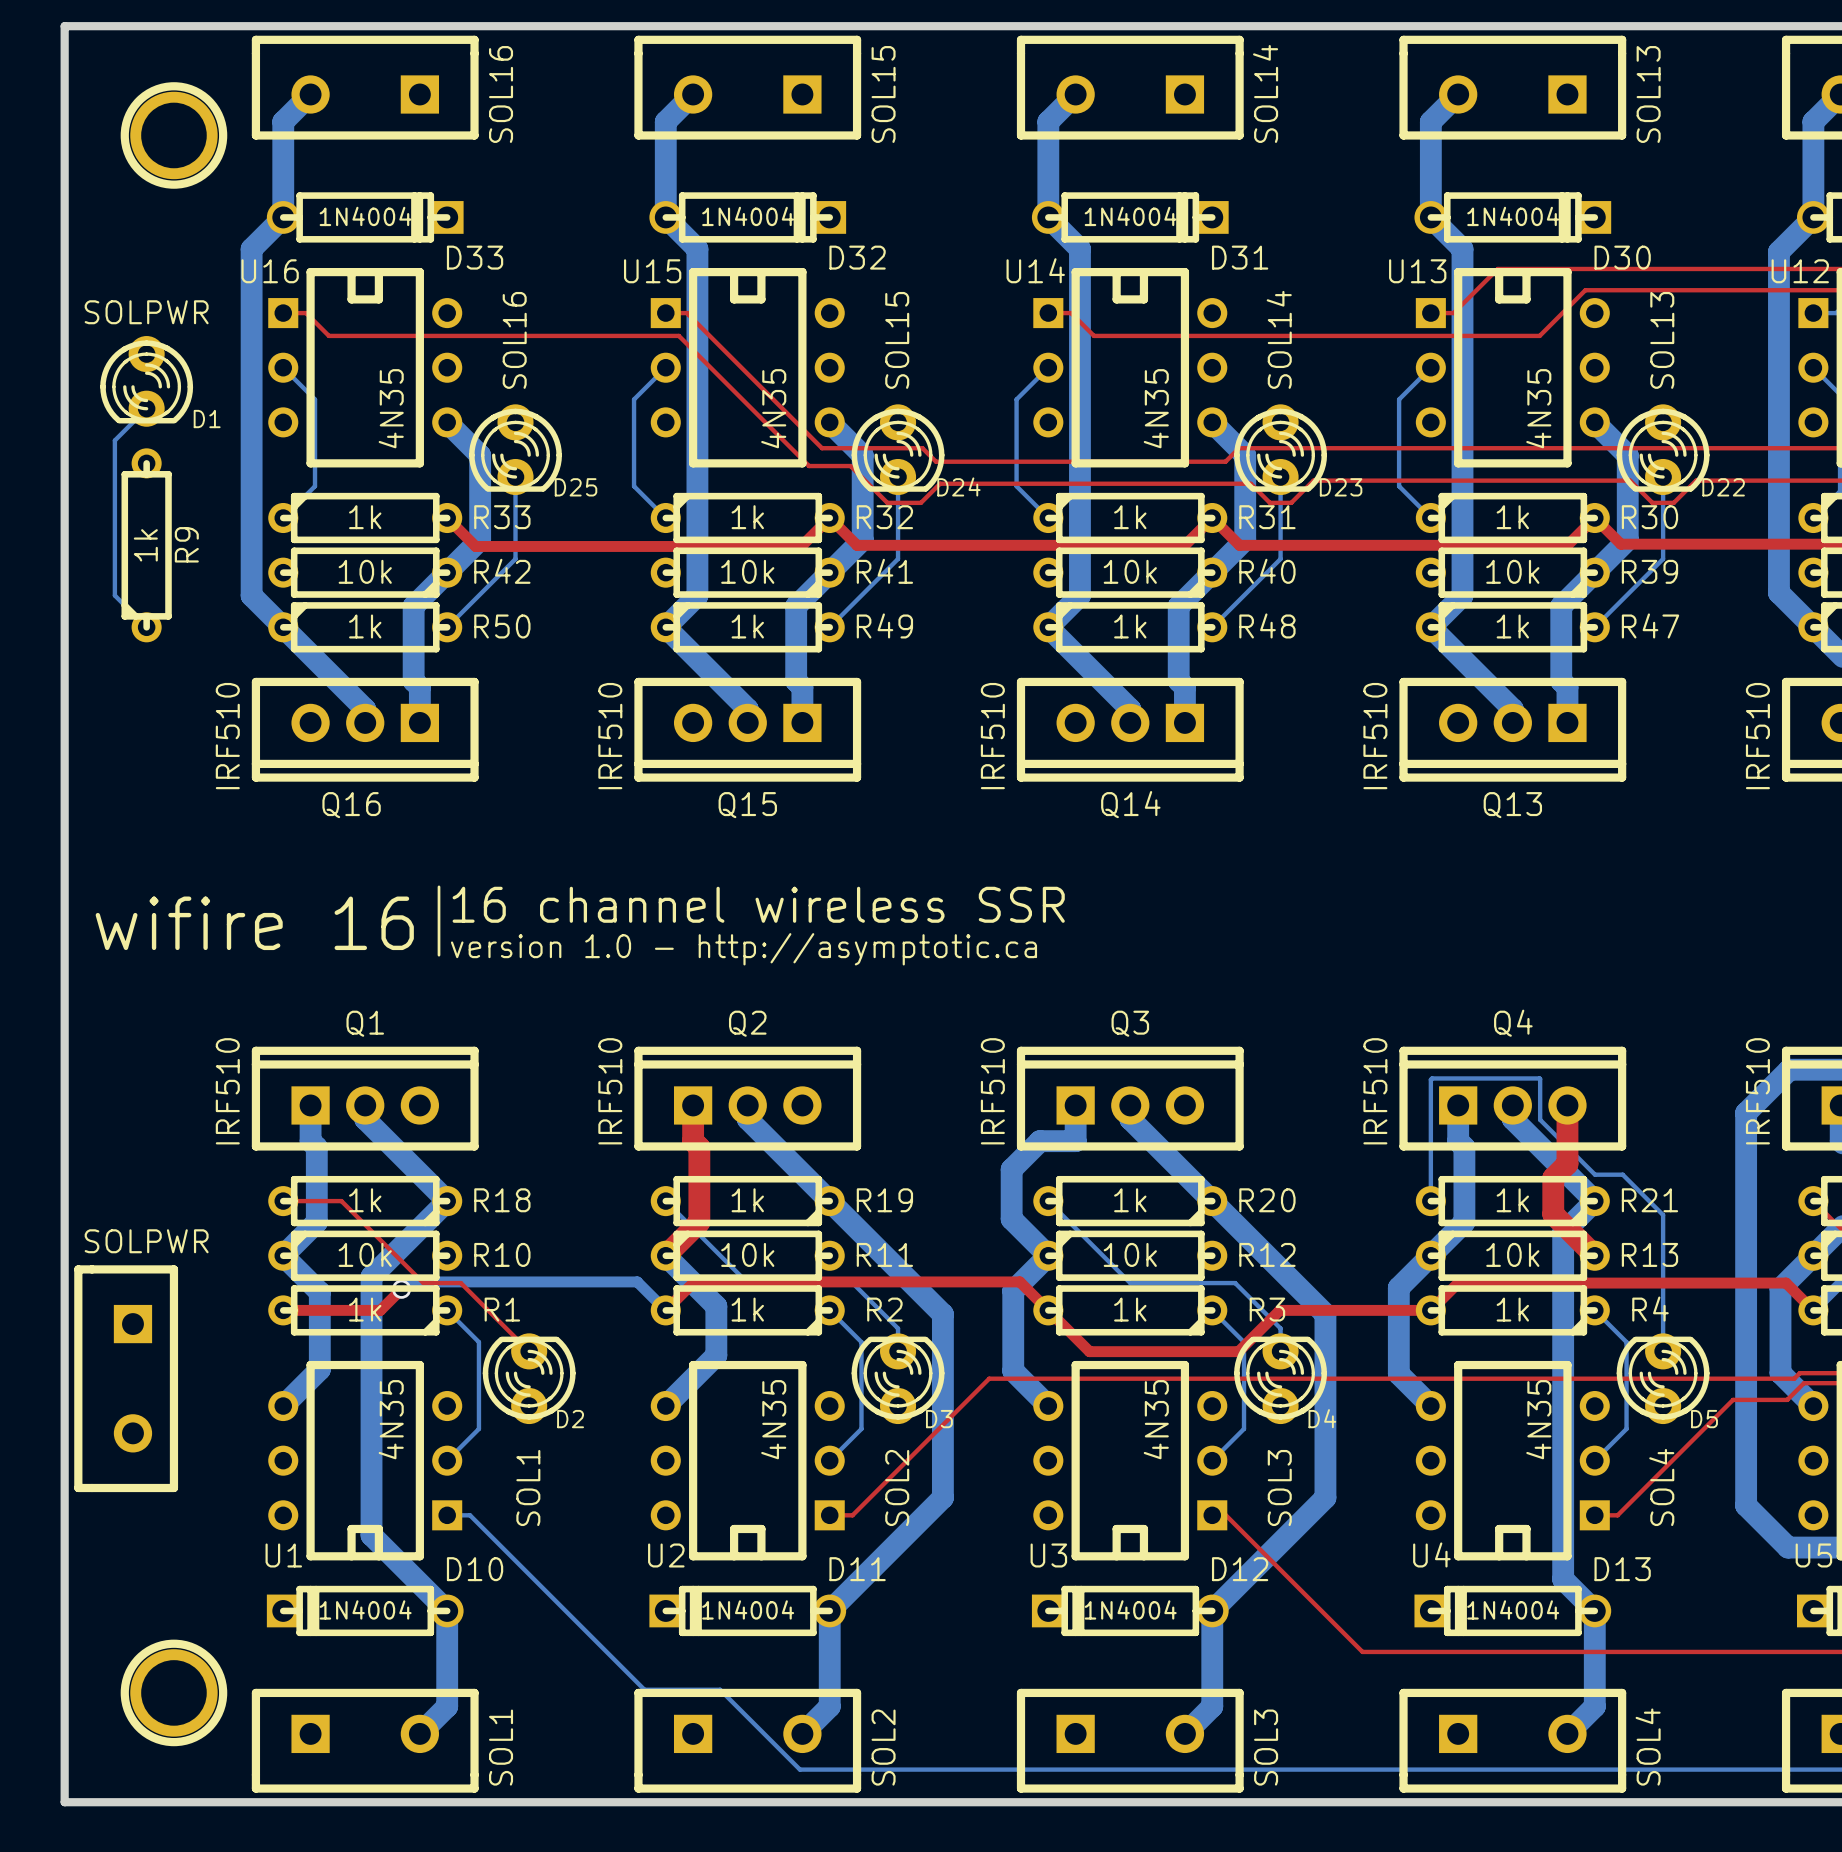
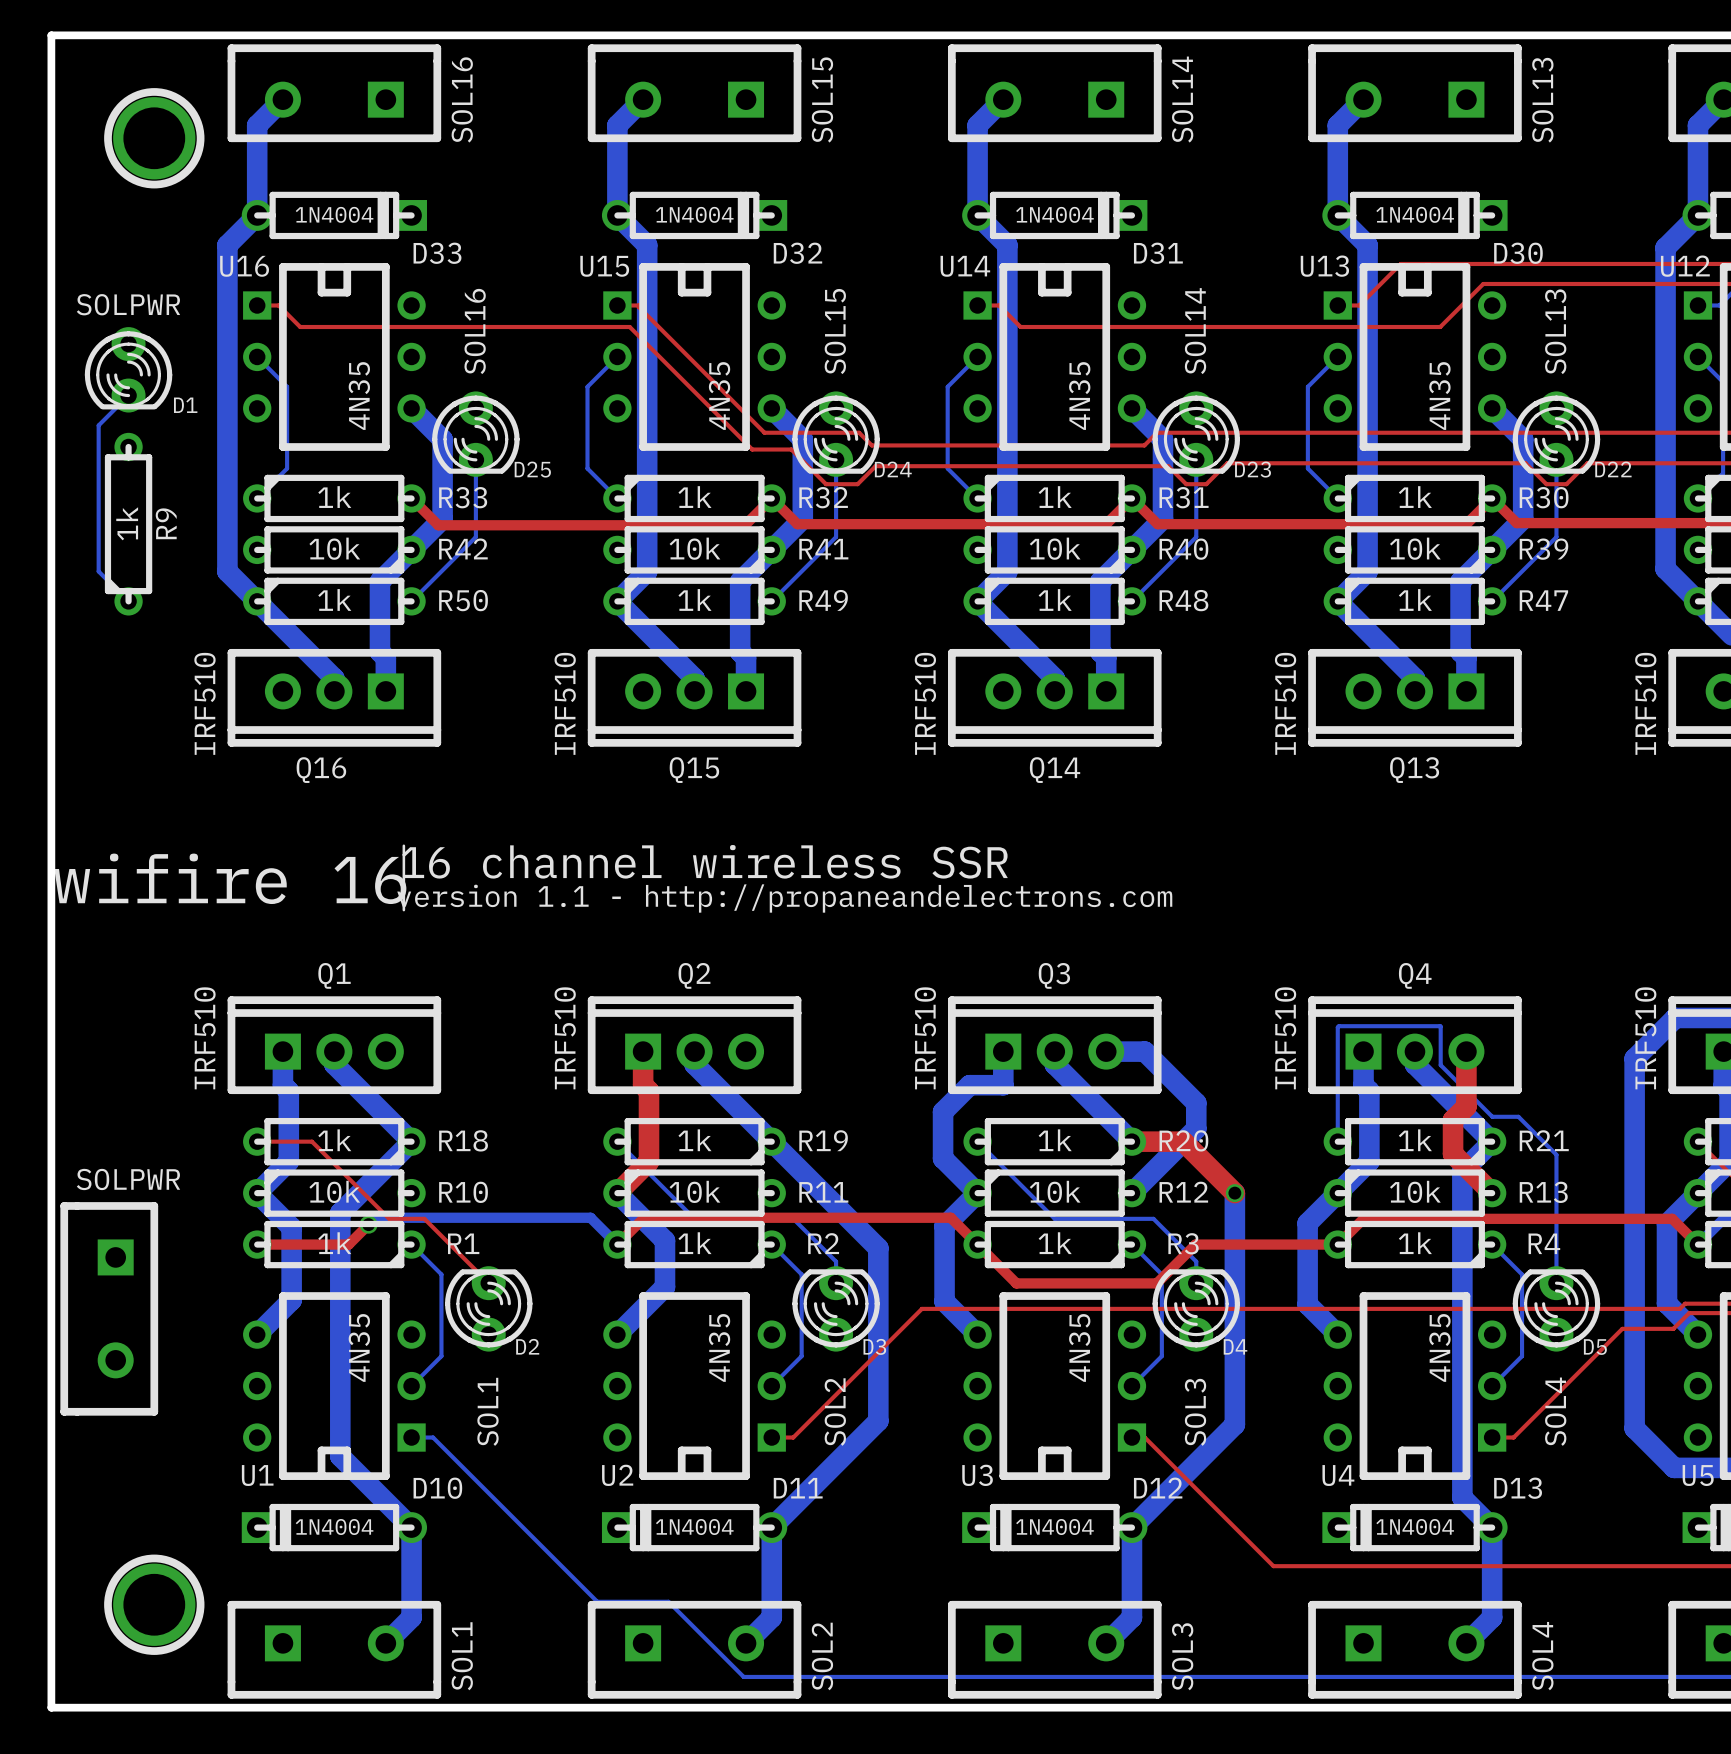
text: version 1.0 - http://asymptotic.ca (743, 949) -> version 1.1 - http://propaneandelectrons.com (784, 898)
bottom track: none -> (1106, 1051) (1144, 1051) (1196, 1103) (1196, 1128) (1131, 1193)
bottom track: (1212, 1201) (1325, 1314) (1325, 1497) (1321, 1501) -> (1234, 1193) (1234, 1424)
top track: none -> (1131, 1141) (1183, 1141) (1234, 1193)
via: none -> (1234, 1193)

